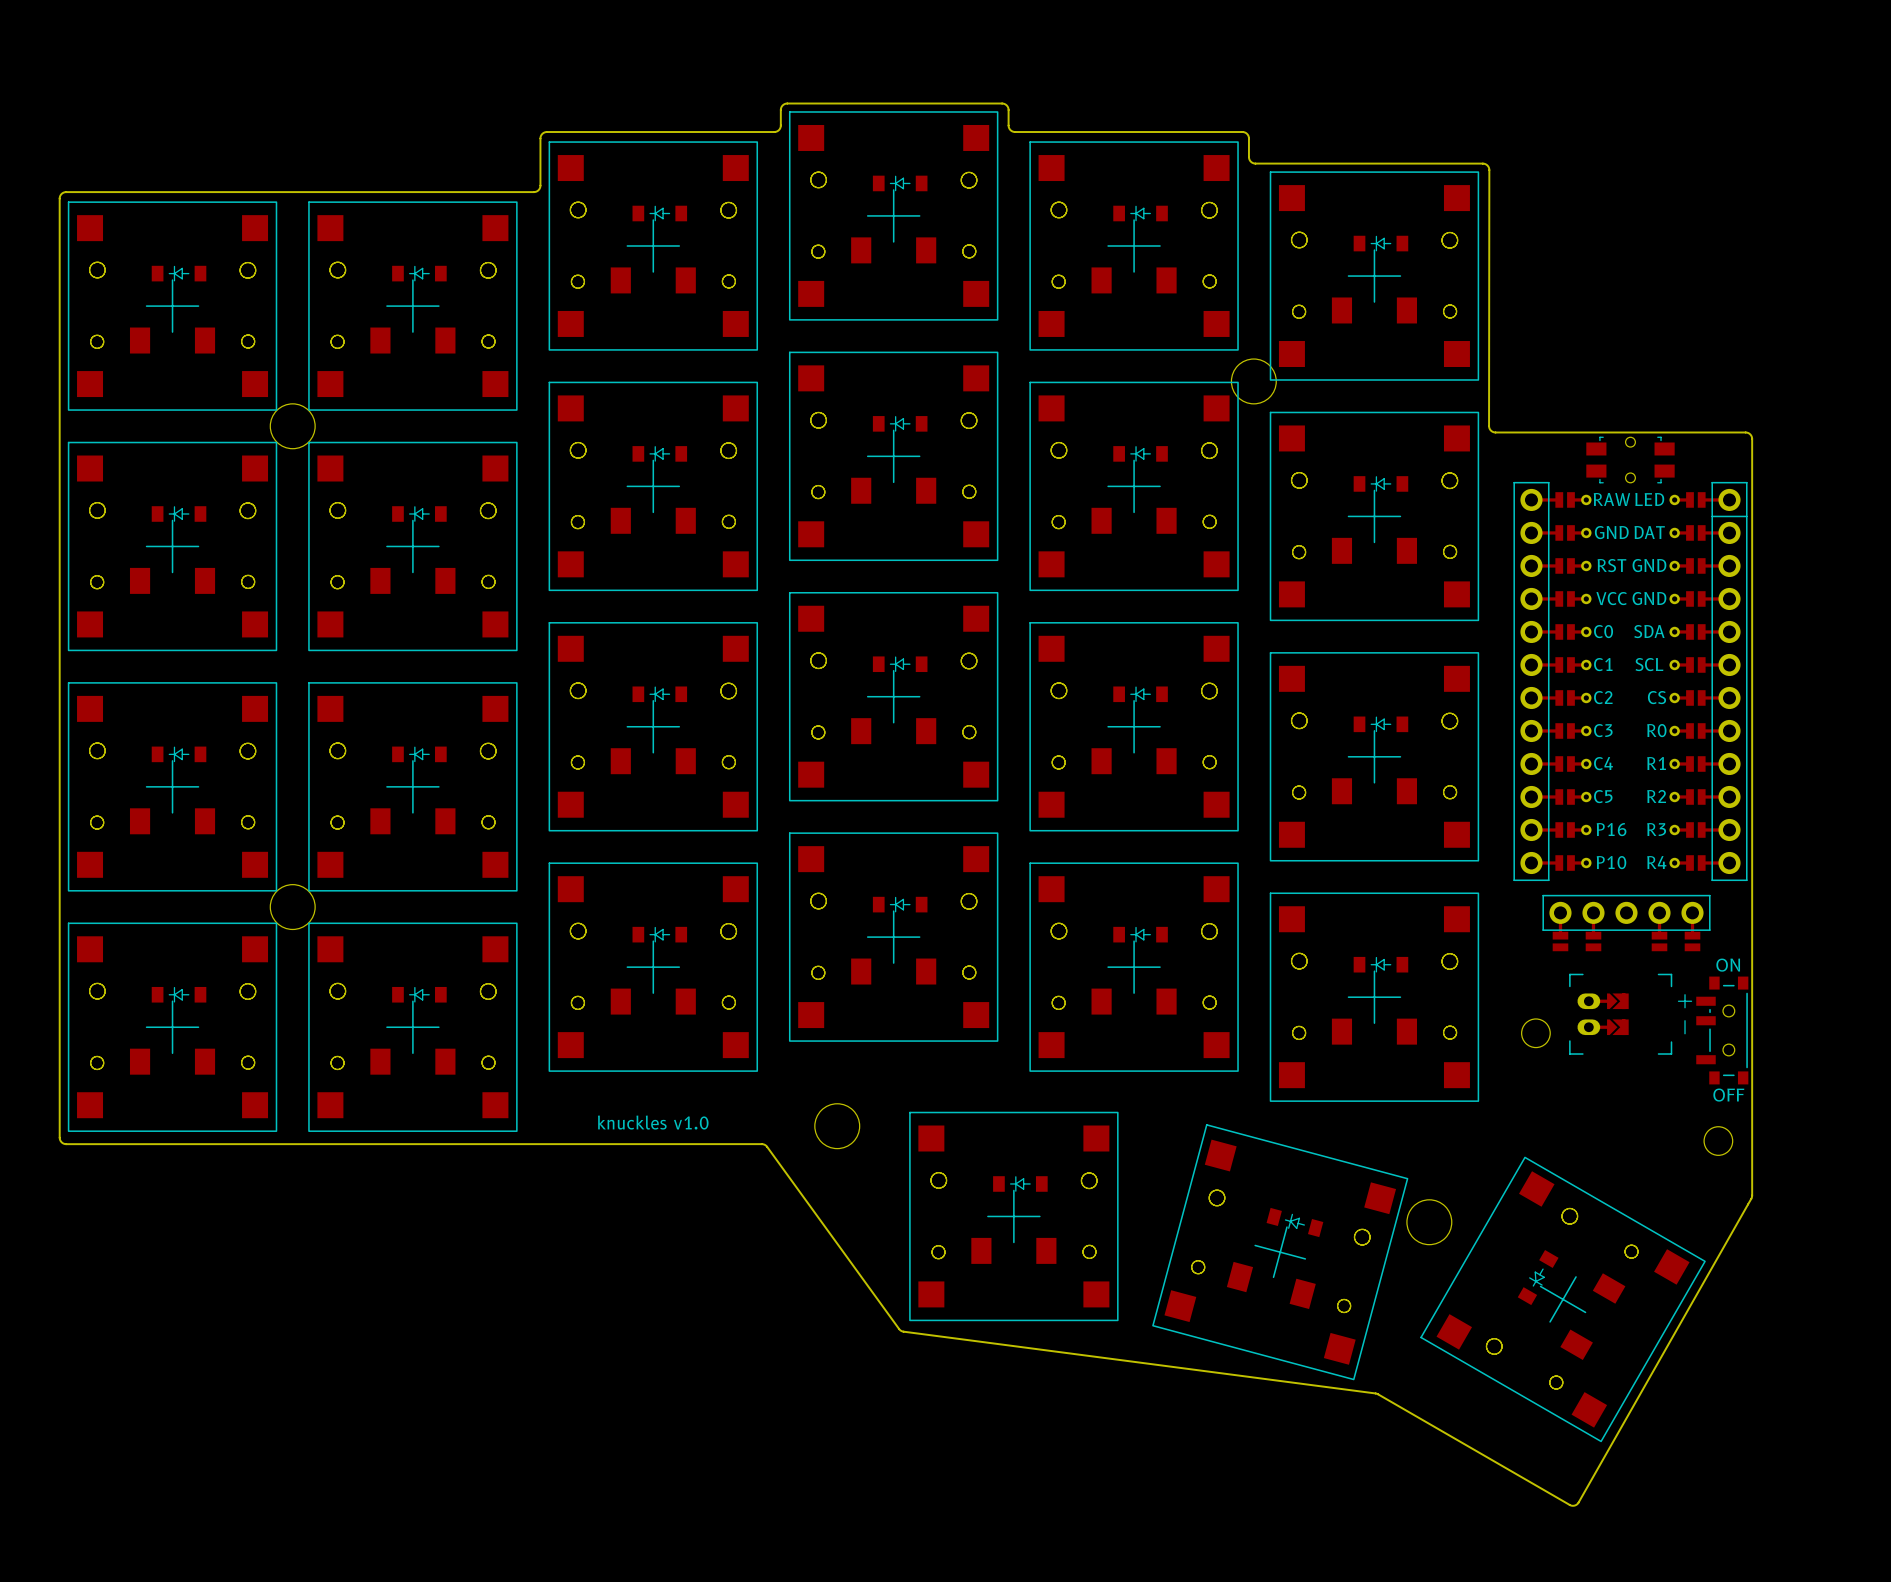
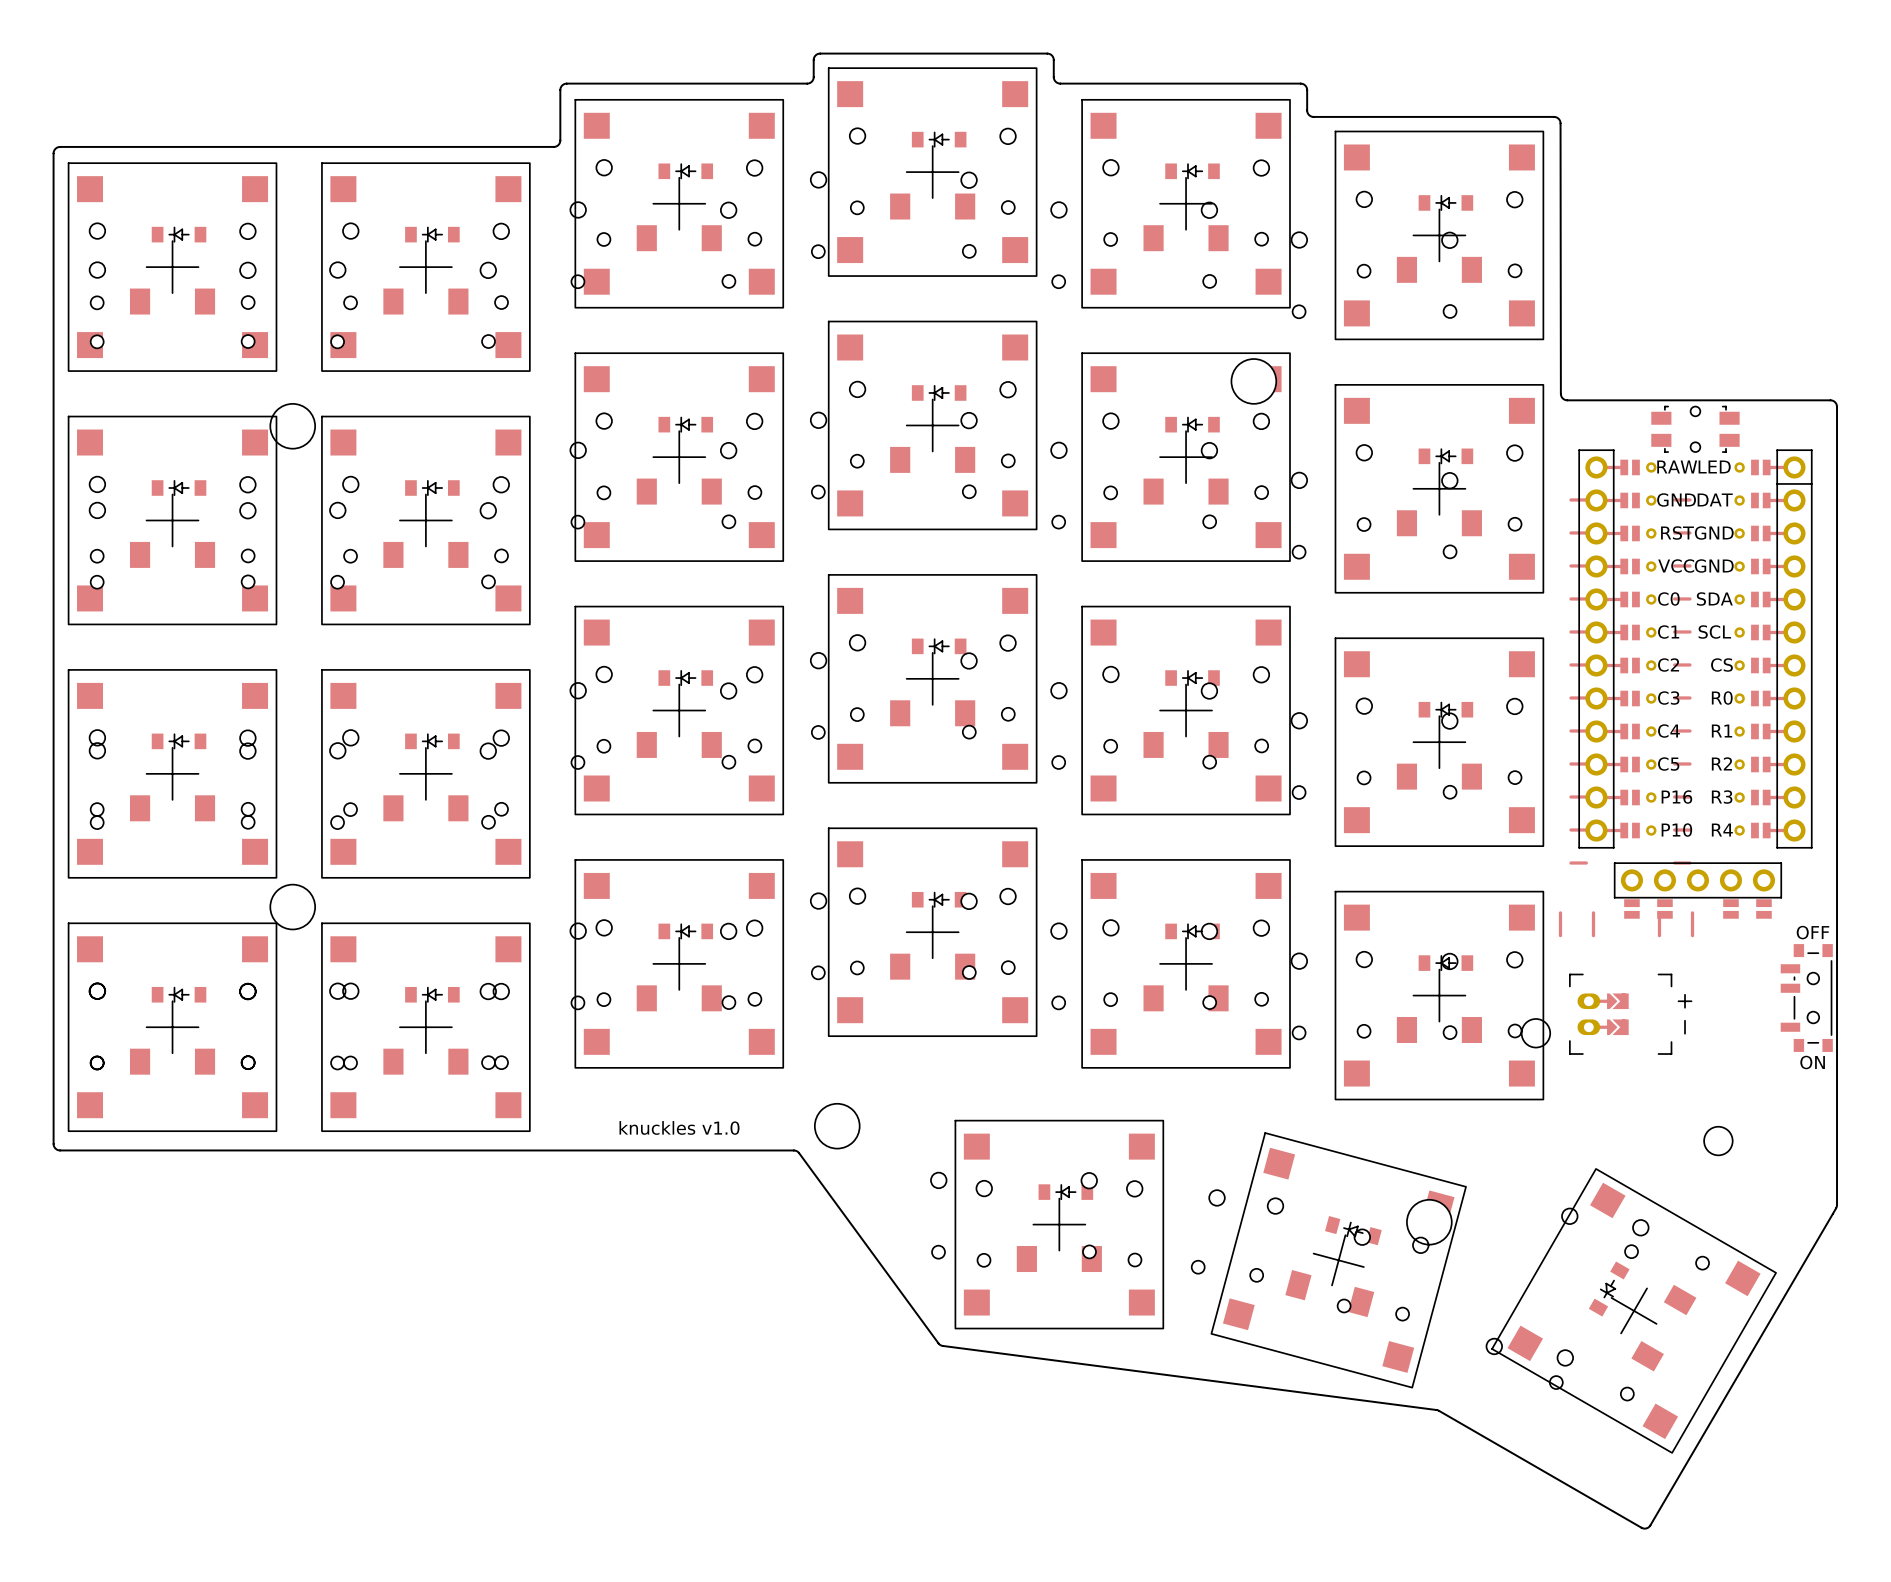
board edge: (787, 103) (1002, 103) (1008, 107) (1008, 126) (1014, 131) (1243, 132) (1248, 136) (1249, 158) (1254, 163) (1485, 163) (1489, 170) (1489, 425) (1490, 430) (1495, 432) (1745, 432) (1751, 435) (1752, 1196) (1576, 1505) (1569, 1504) (1376, 1393) (901, 1331) (767, 1146) (763, 1144) (66, 1144) (60, 1141) (60, 195) (66, 192) (534, 192) (540, 186) (540, 137) (544, 132) (775, 131) (780, 126) (781, 107) (787, 103) -> (820, 53) (814, 57) (813, 78) (807, 83) (564, 83) (560, 89) (560, 141) (554, 146) (60, 146) (54, 149) (54, 1147) (60, 1150) (795, 1150) (799, 1153) (941, 1345) (1437, 1410) (1641, 1527) (1647, 1527) (1836, 1205) (1836, 403) (1830, 400) (1567, 400) (1562, 398) (1560, 393) (1560, 123) (1556, 117) (1312, 116) (1307, 112) (1307, 88) (1301, 83) (1059, 83) (1053, 78) (1053, 57) (1048, 53) (820, 53)
part position: (900, 183) -> (939, 139)
part position: (659, 213) -> (685, 171)
part position: (1140, 213) -> (1192, 171)
part position: (893, 215) -> (932, 172)
part: none -> (179, 234)
part: none -> (432, 234)
part position: (1380, 243) -> (1445, 202)
part position: (653, 245) -> (679, 203)
part position: (1134, 245) -> (1186, 203)
part footprint: [151, 265, 207, 282] -> [67, 162, 278, 372]
part footprint: [392, 265, 447, 282] -> [321, 162, 531, 372]
part position: (1374, 276) -> (1439, 235)
part: (172, 306) -> none
part: (412, 306) -> none
part position: (900, 423) -> (939, 392)
part position: (659, 453) -> (685, 424)
part position: (1140, 453) -> (1192, 424)
part position: (893, 456) -> (932, 425)
part position: (1630, 460) -> (1695, 429)
part position: (1380, 483) -> (1445, 456)
part position: (653, 486) -> (679, 457)
part position: (1134, 486) -> (1186, 457)
part: none -> (179, 488)
part: none -> (432, 488)
track: (1531, 499) (1559, 499) -> (1596, 467) (1623, 467)
track: (1701, 499) (1729, 499) -> (1766, 467) (1794, 467)
part footprint: [151, 506, 207, 522] -> [67, 415, 278, 626]
part footprint: [392, 506, 447, 522] -> [321, 415, 531, 626]
part position: (1374, 516) -> (1439, 488)
track: (1531, 532) (1559, 532) -> (1596, 500) (1623, 500)
track: (1701, 532) (1729, 532) -> (1766, 500) (1794, 500)
part: (172, 546) -> none
part: (412, 546) -> none
track: (1531, 565) (1559, 565) -> (1596, 533) (1623, 533)
track: (1701, 565) (1729, 565) -> (1766, 533) (1794, 533)
track: (1531, 598) (1559, 598) -> (1596, 566) (1623, 566)
track: (1701, 598) (1729, 598) -> (1766, 566) (1794, 566)
track: (1531, 631) (1559, 631) -> (1596, 599) (1623, 599)
track: (1701, 631) (1729, 631) -> (1766, 599) (1794, 599)
part position: (900, 664) -> (939, 646)
track: (1531, 664) (1559, 664) -> (1596, 632) (1623, 632)
track: (1701, 664) (1729, 664) -> (1766, 632) (1794, 632)
part position: (1630, 681) -> (1695, 648)
part position: (659, 694) -> (685, 678)
part position: (1140, 694) -> (1192, 678)
part position: (893, 696) -> (932, 678)
track: (1531, 697) (1559, 697) -> (1596, 665) (1623, 665)
track: (1701, 697) (1729, 697) -> (1766, 665) (1794, 665)
part position: (1380, 724) -> (1445, 709)
part position: (653, 726) -> (679, 710)
part position: (1134, 726) -> (1186, 710)
track: (1531, 730) (1559, 730) -> (1596, 698) (1623, 698)
track: (1701, 730) (1729, 730) -> (1766, 698) (1794, 698)
part position: (179, 754) -> (179, 741)
part position: (419, 754) -> (432, 741)
part position: (1374, 756) -> (1439, 742)
track: (1531, 763) (1559, 763) -> (1596, 731) (1623, 731)
track: (1701, 763) (1729, 763) -> (1766, 731) (1794, 731)
part position: (172, 786) -> (172, 773)
part position: (412, 786) -> (425, 773)
track: (1531, 796) (1559, 796) -> (1596, 764) (1623, 764)
track: (1701, 796) (1729, 796) -> (1766, 764) (1794, 764)
track: (1531, 829) (1559, 829) -> (1596, 797) (1623, 797)
track: (1701, 829) (1729, 829) -> (1766, 797) (1794, 797)
track: (1531, 863) (1559, 863) -> (1596, 830) (1623, 830)
track: (1701, 863) (1729, 863) -> (1766, 830) (1794, 830)
part position: (900, 904) -> (939, 899)
part position: (1626, 923) -> (1697, 890)
part position: (659, 934) -> (685, 931)
part position: (1140, 934) -> (1192, 931)
part position: (893, 937) -> (932, 932)
part position: (1380, 964) -> (1445, 963)
part position: (653, 967) -> (679, 963)
part position: (1134, 967) -> (1186, 963)
part position: (419, 994) -> (432, 994)
part position: (1374, 997) -> (1439, 995)
part: none -> (1806, 998)
part position: (412, 1027) -> (425, 1027)
part: (1722, 1030) -> none
text position: knuckles v1.0 (653, 1122) -> knuckles v1.0 (679, 1127)
part position: (1020, 1183) -> (1065, 1192)
part position: (1013, 1216) -> (1059, 1224)
part position: (1294, 1222) -> (1353, 1230)
part position: (1280, 1252) -> (1338, 1260)
part position: (1538, 1277) -> (1609, 1289)
part position: (1563, 1299) -> (1634, 1310)

